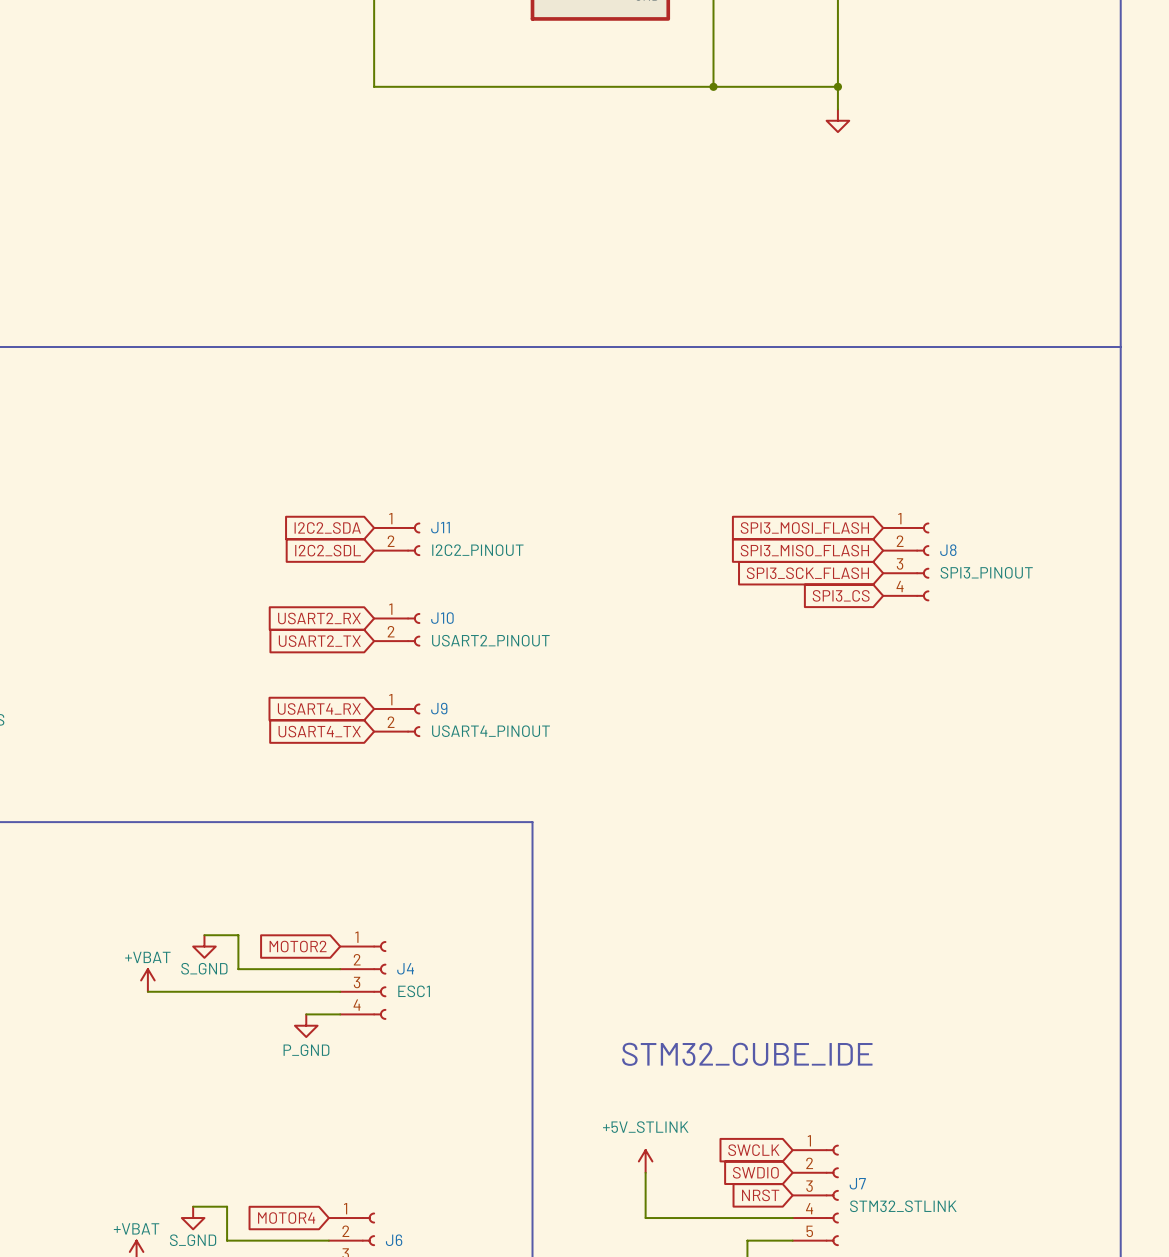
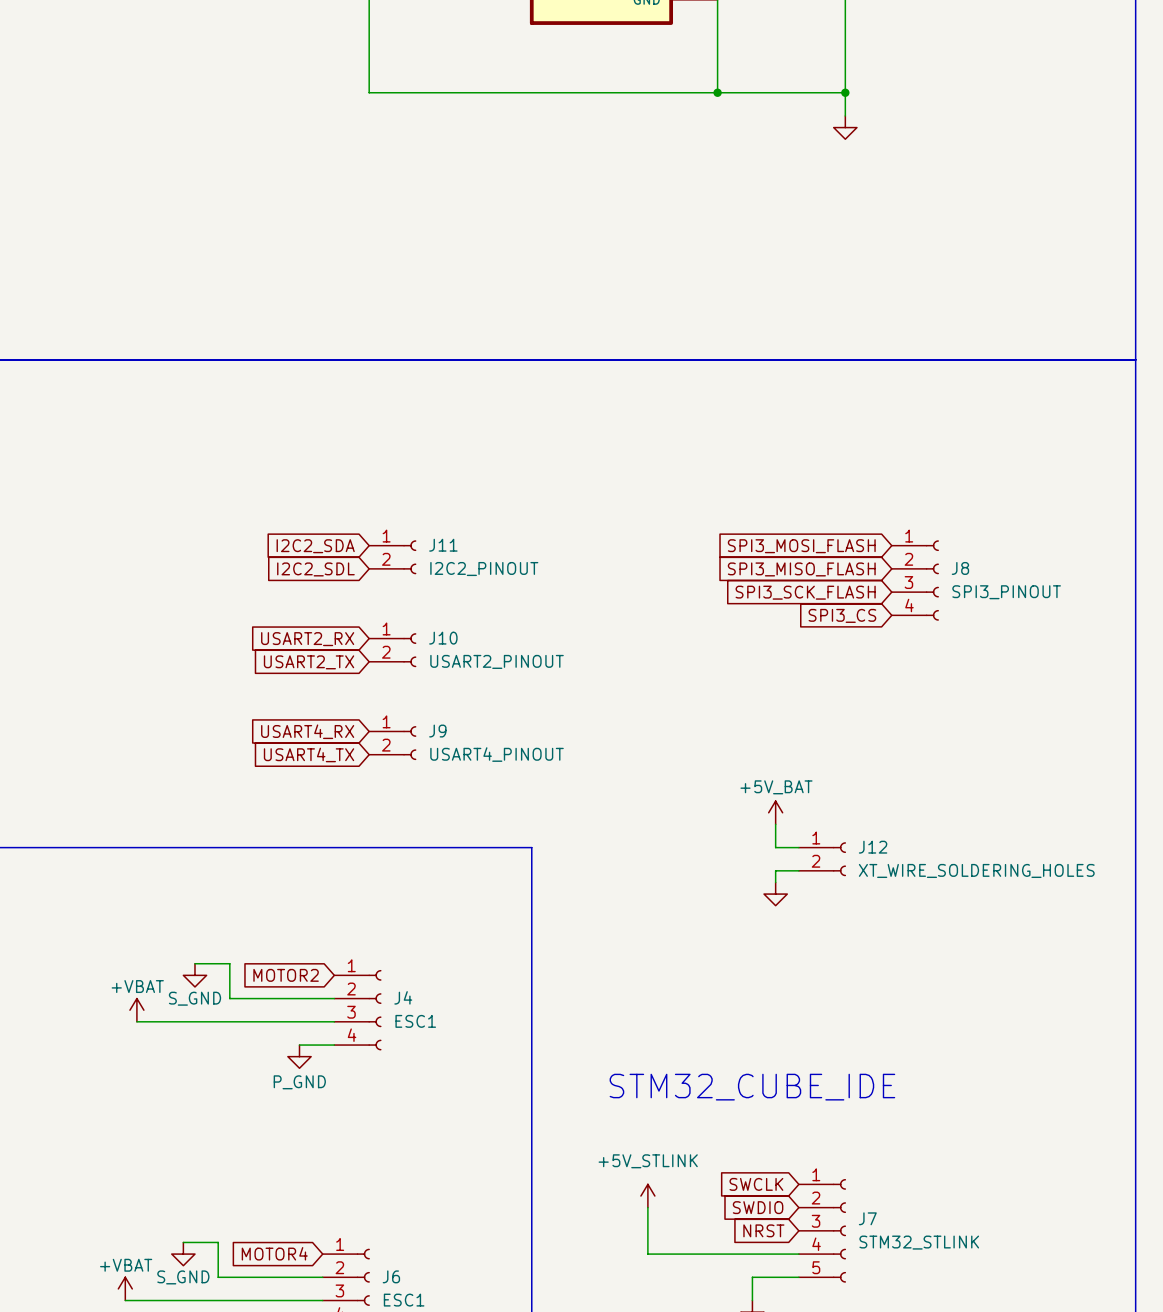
power symbol: none -> +5V_BAT (775, 812)
wire: none -> (775, 824) (775, 847) (798, 847)
J12: none -> XT_WIRE_SOLDERING_HOLES (822, 859)
wire: none -> (798, 870) (775, 870) (775, 882)
power symbol: none -> (775, 894)

